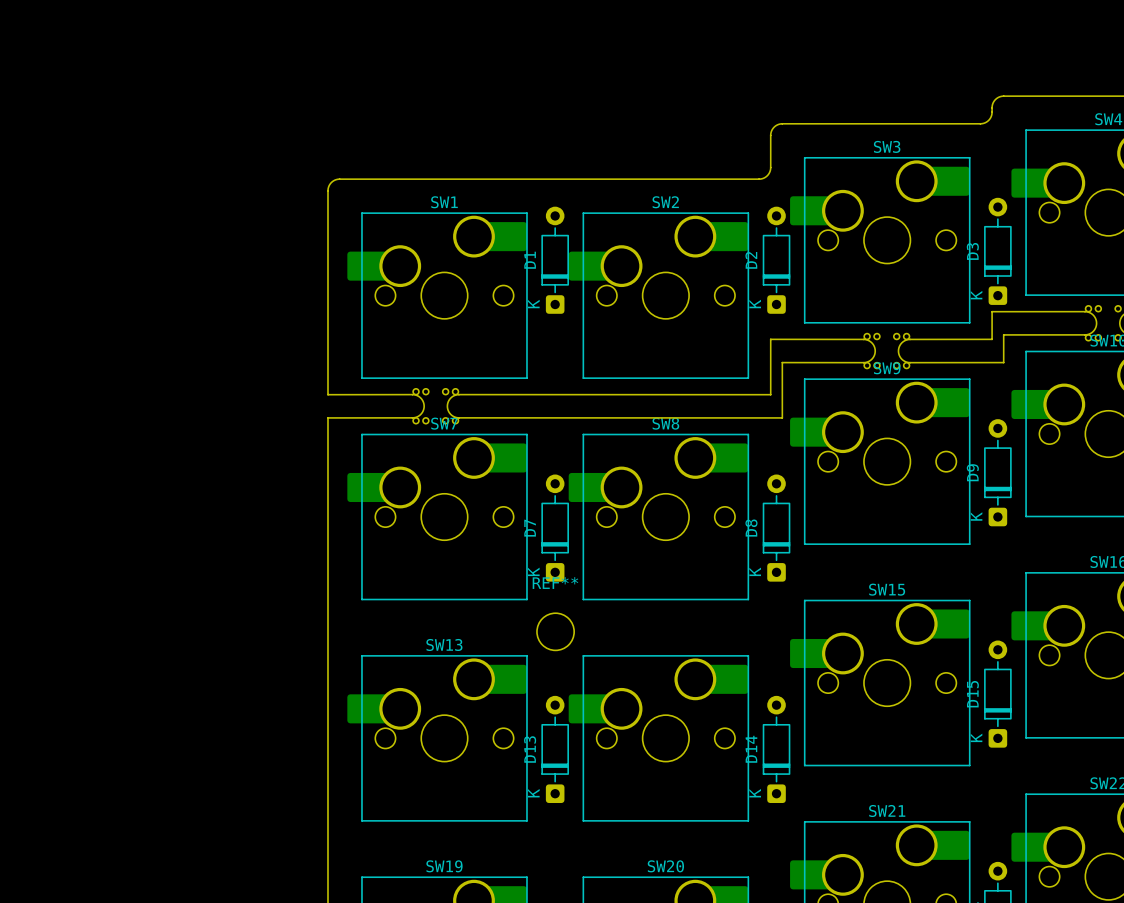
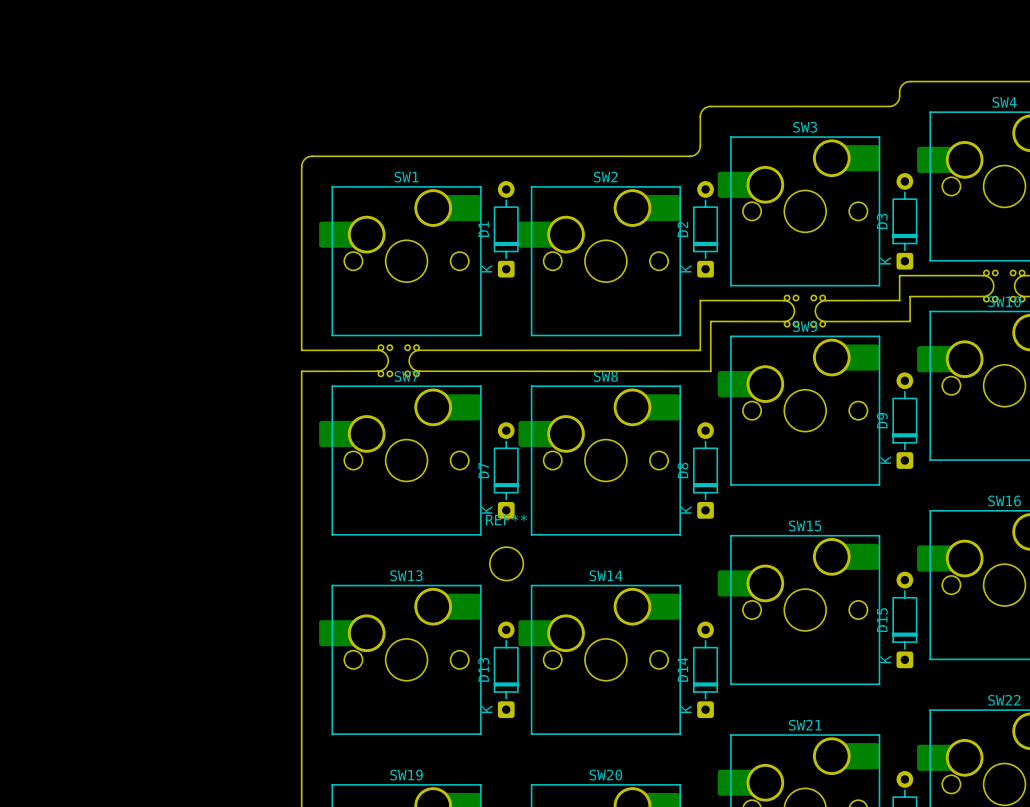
SW14 name: none -> SW14 (606, 575)

